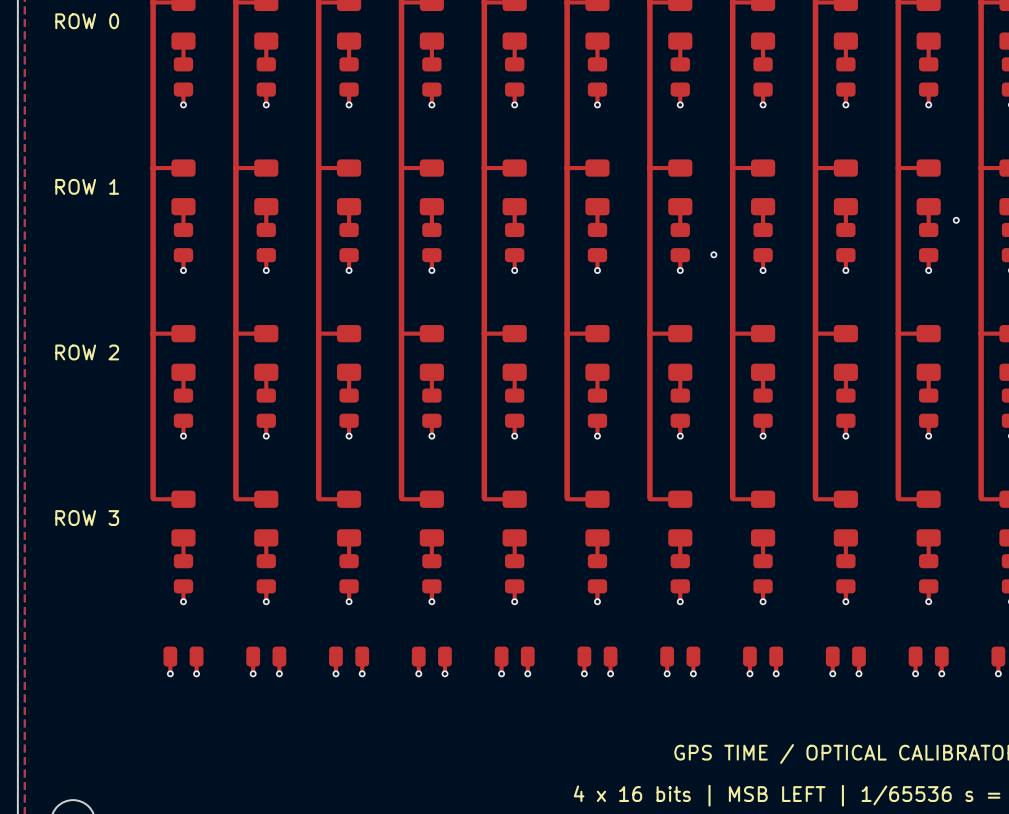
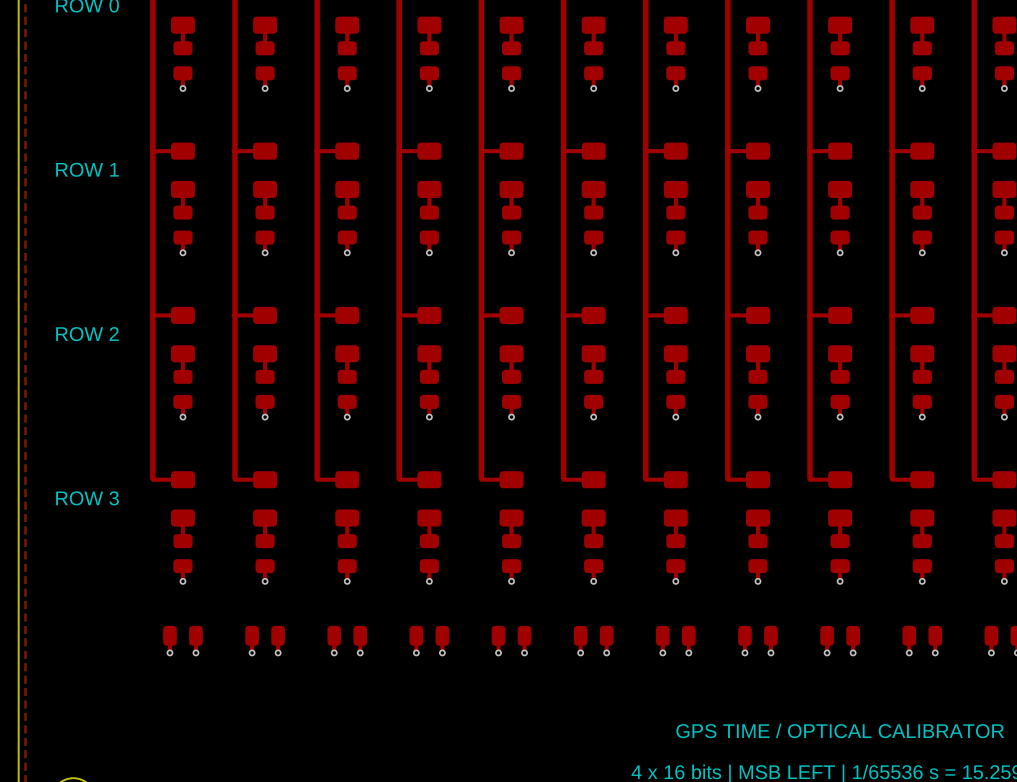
via: (956, 220) -> none
via: (713, 254) -> none

